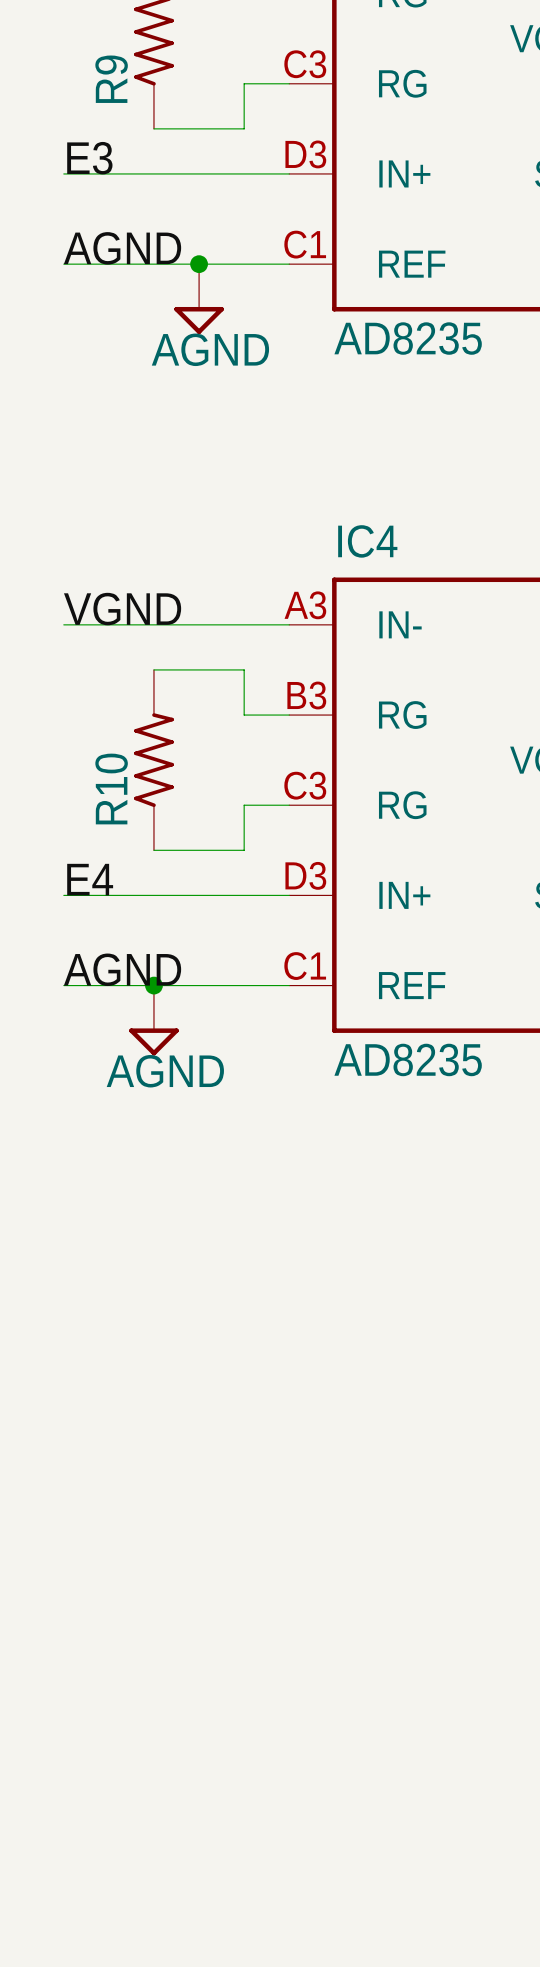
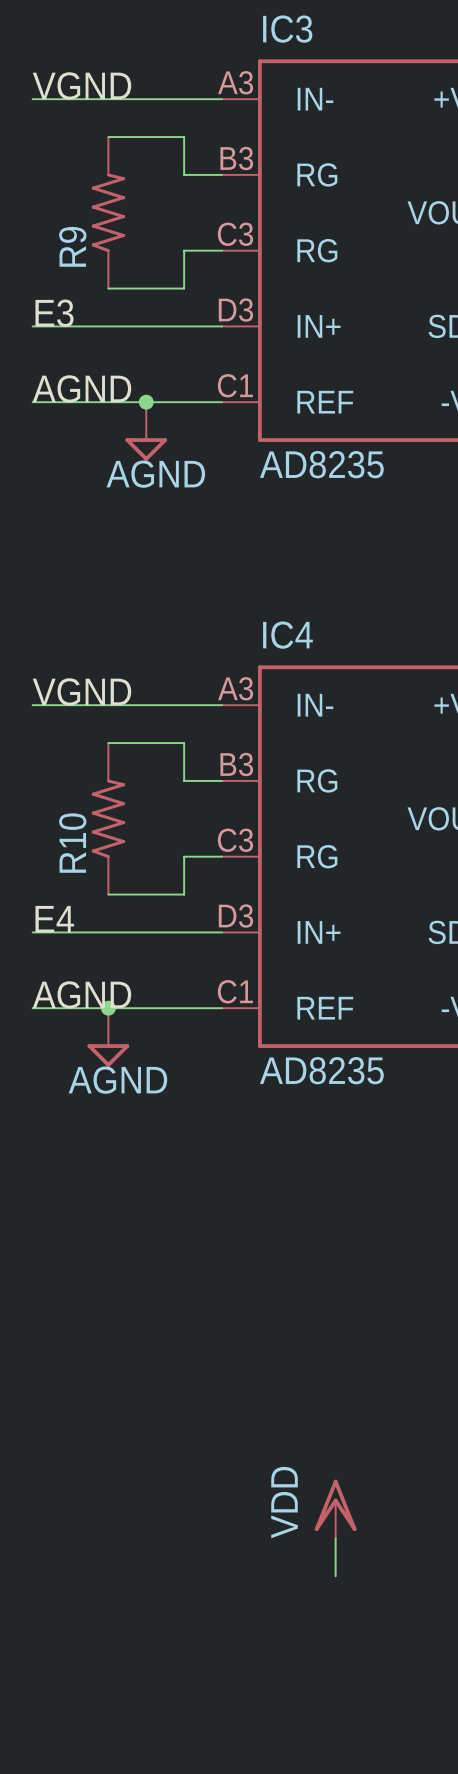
power symbol: none -> VDD (335, 1509)
wire: none -> (335, 1538) (335, 1576)

